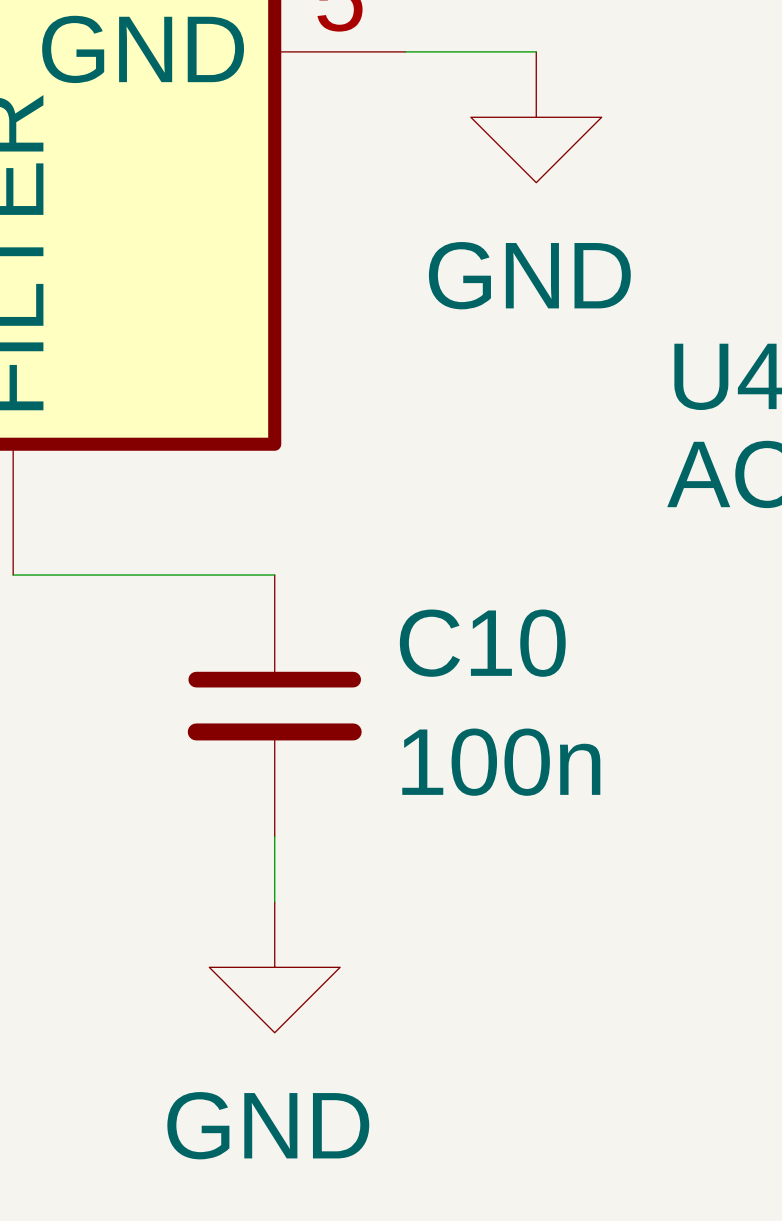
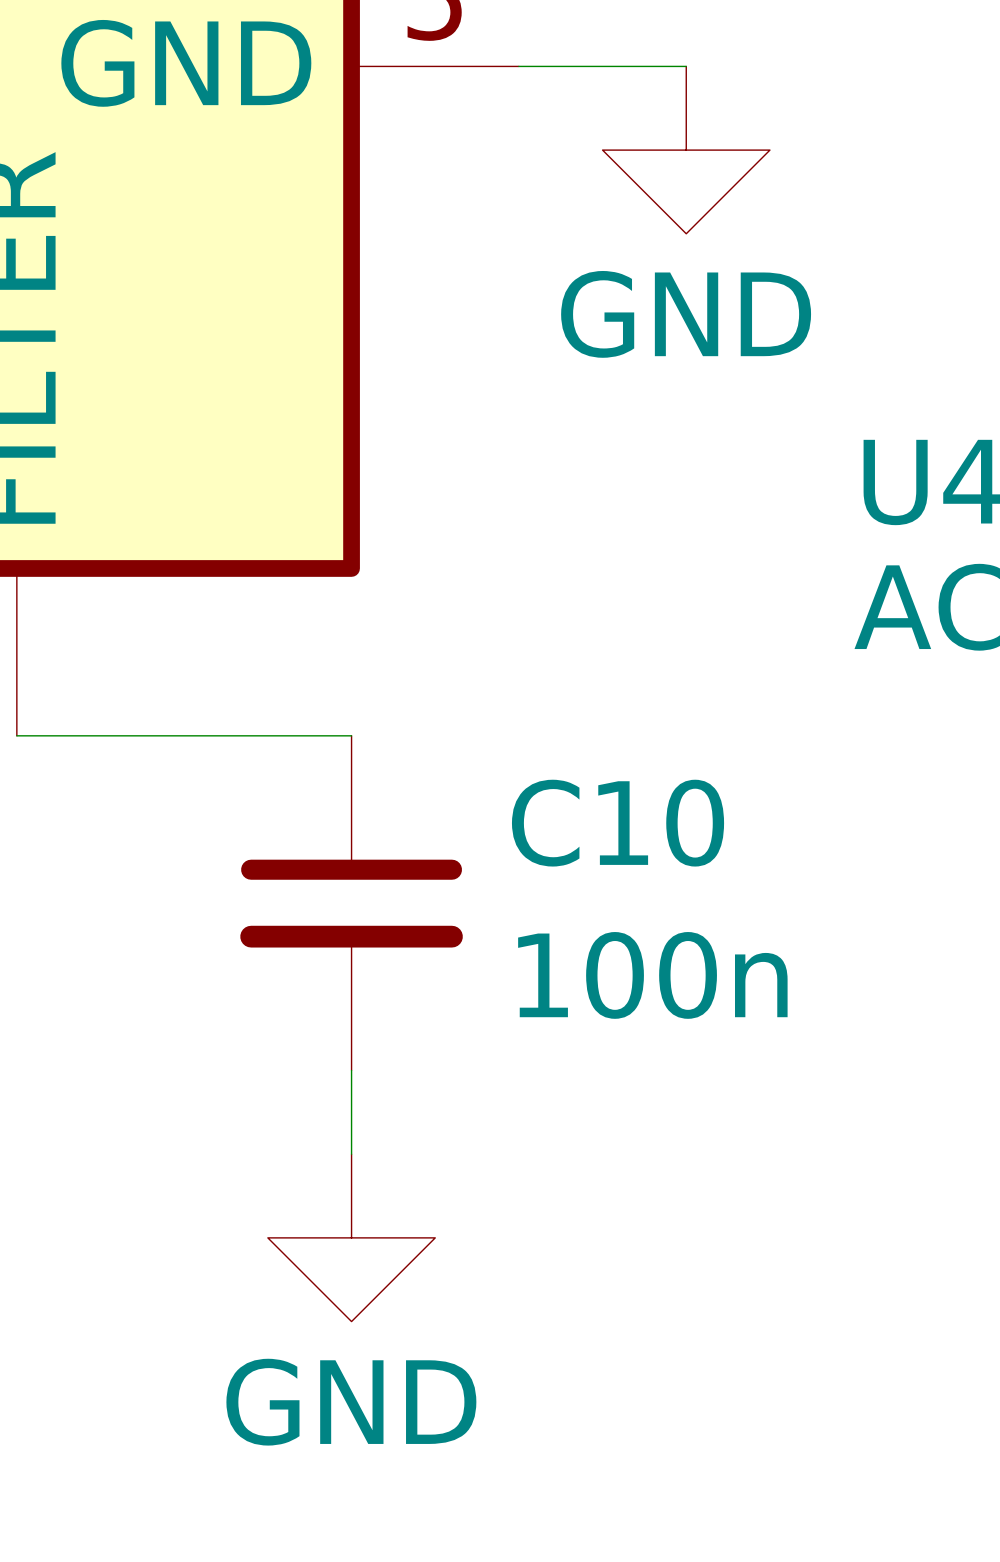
power symbol text position: GND (529, 275) -> GND (686, 314)
power symbol text position: GND (268, 1125) -> GND (351, 1402)

